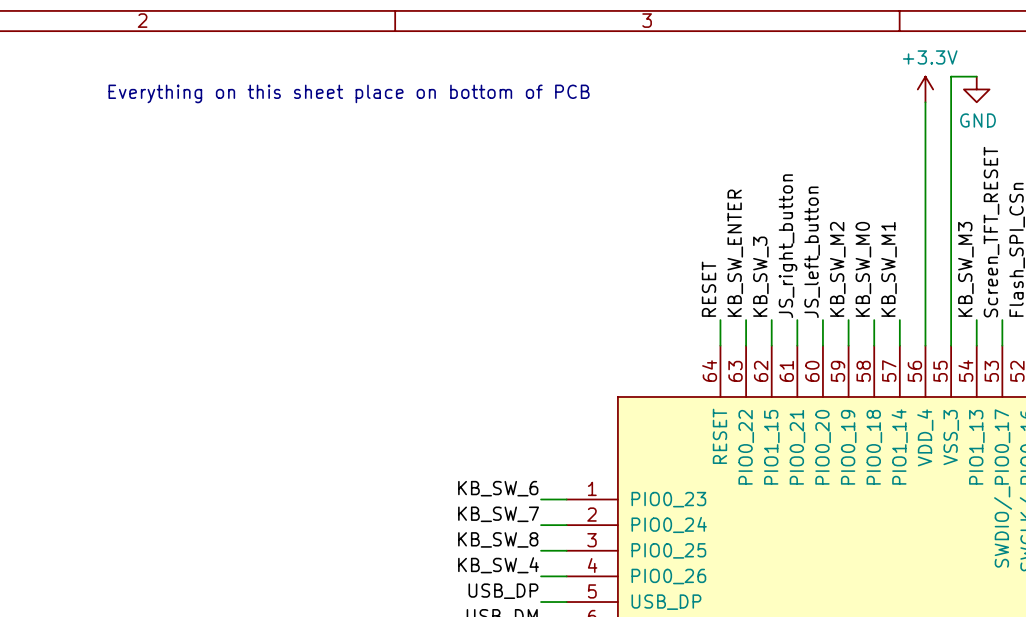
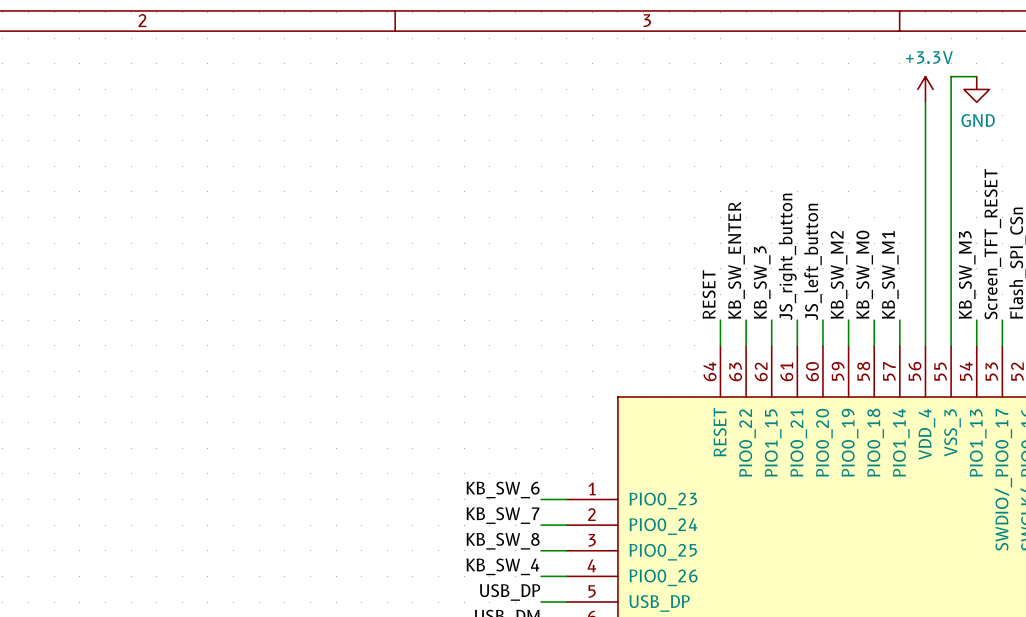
text: Everything on this sheet place on bottom of PCB (349, 93) -> none

